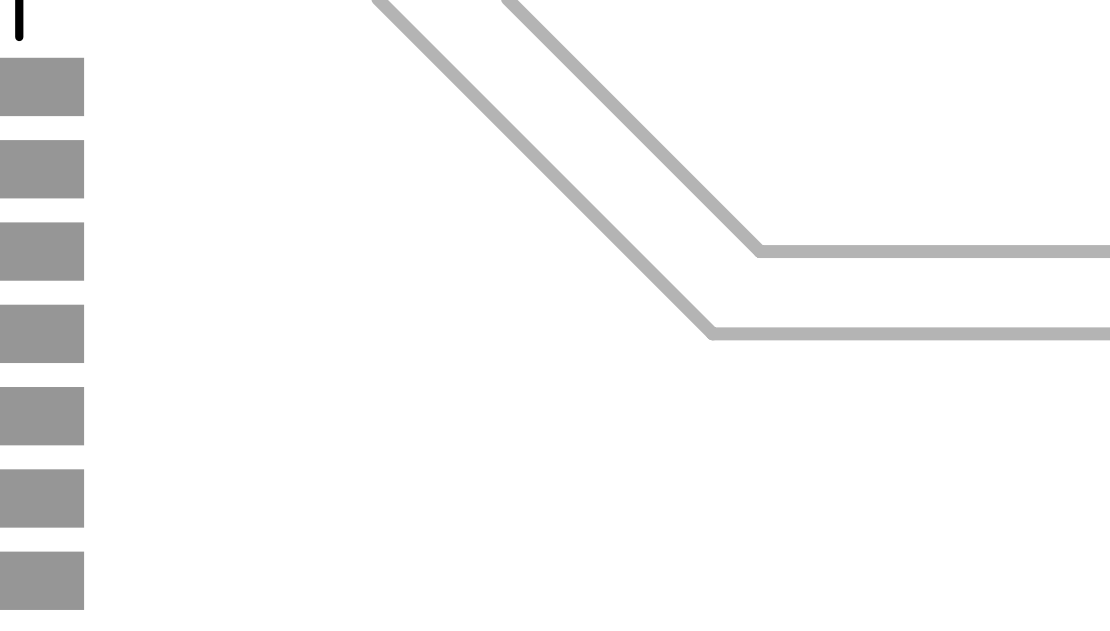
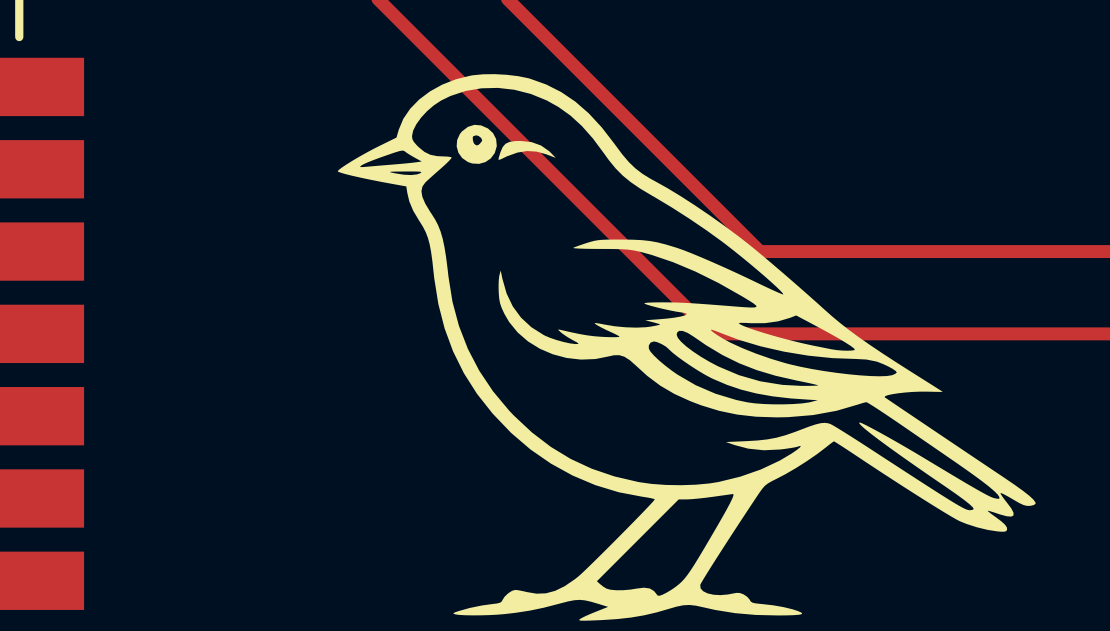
drawing: none -> [337, 74, 1036, 621]

